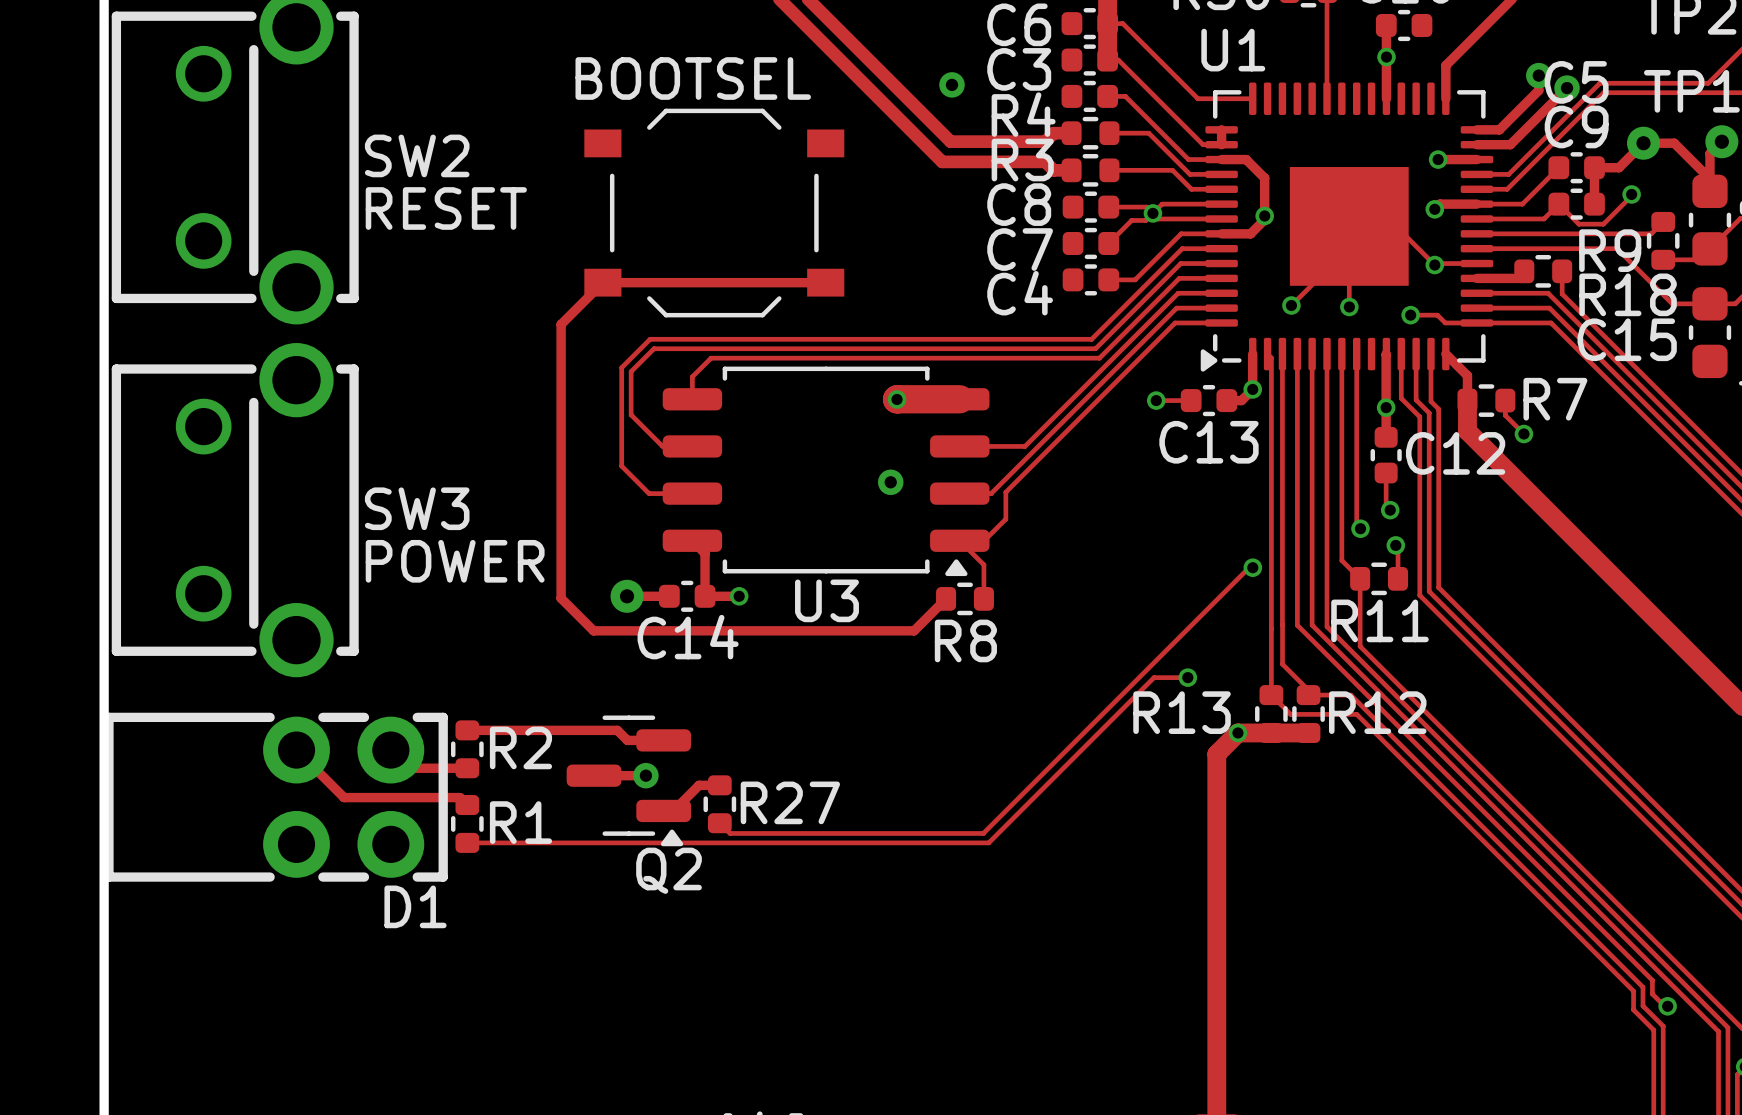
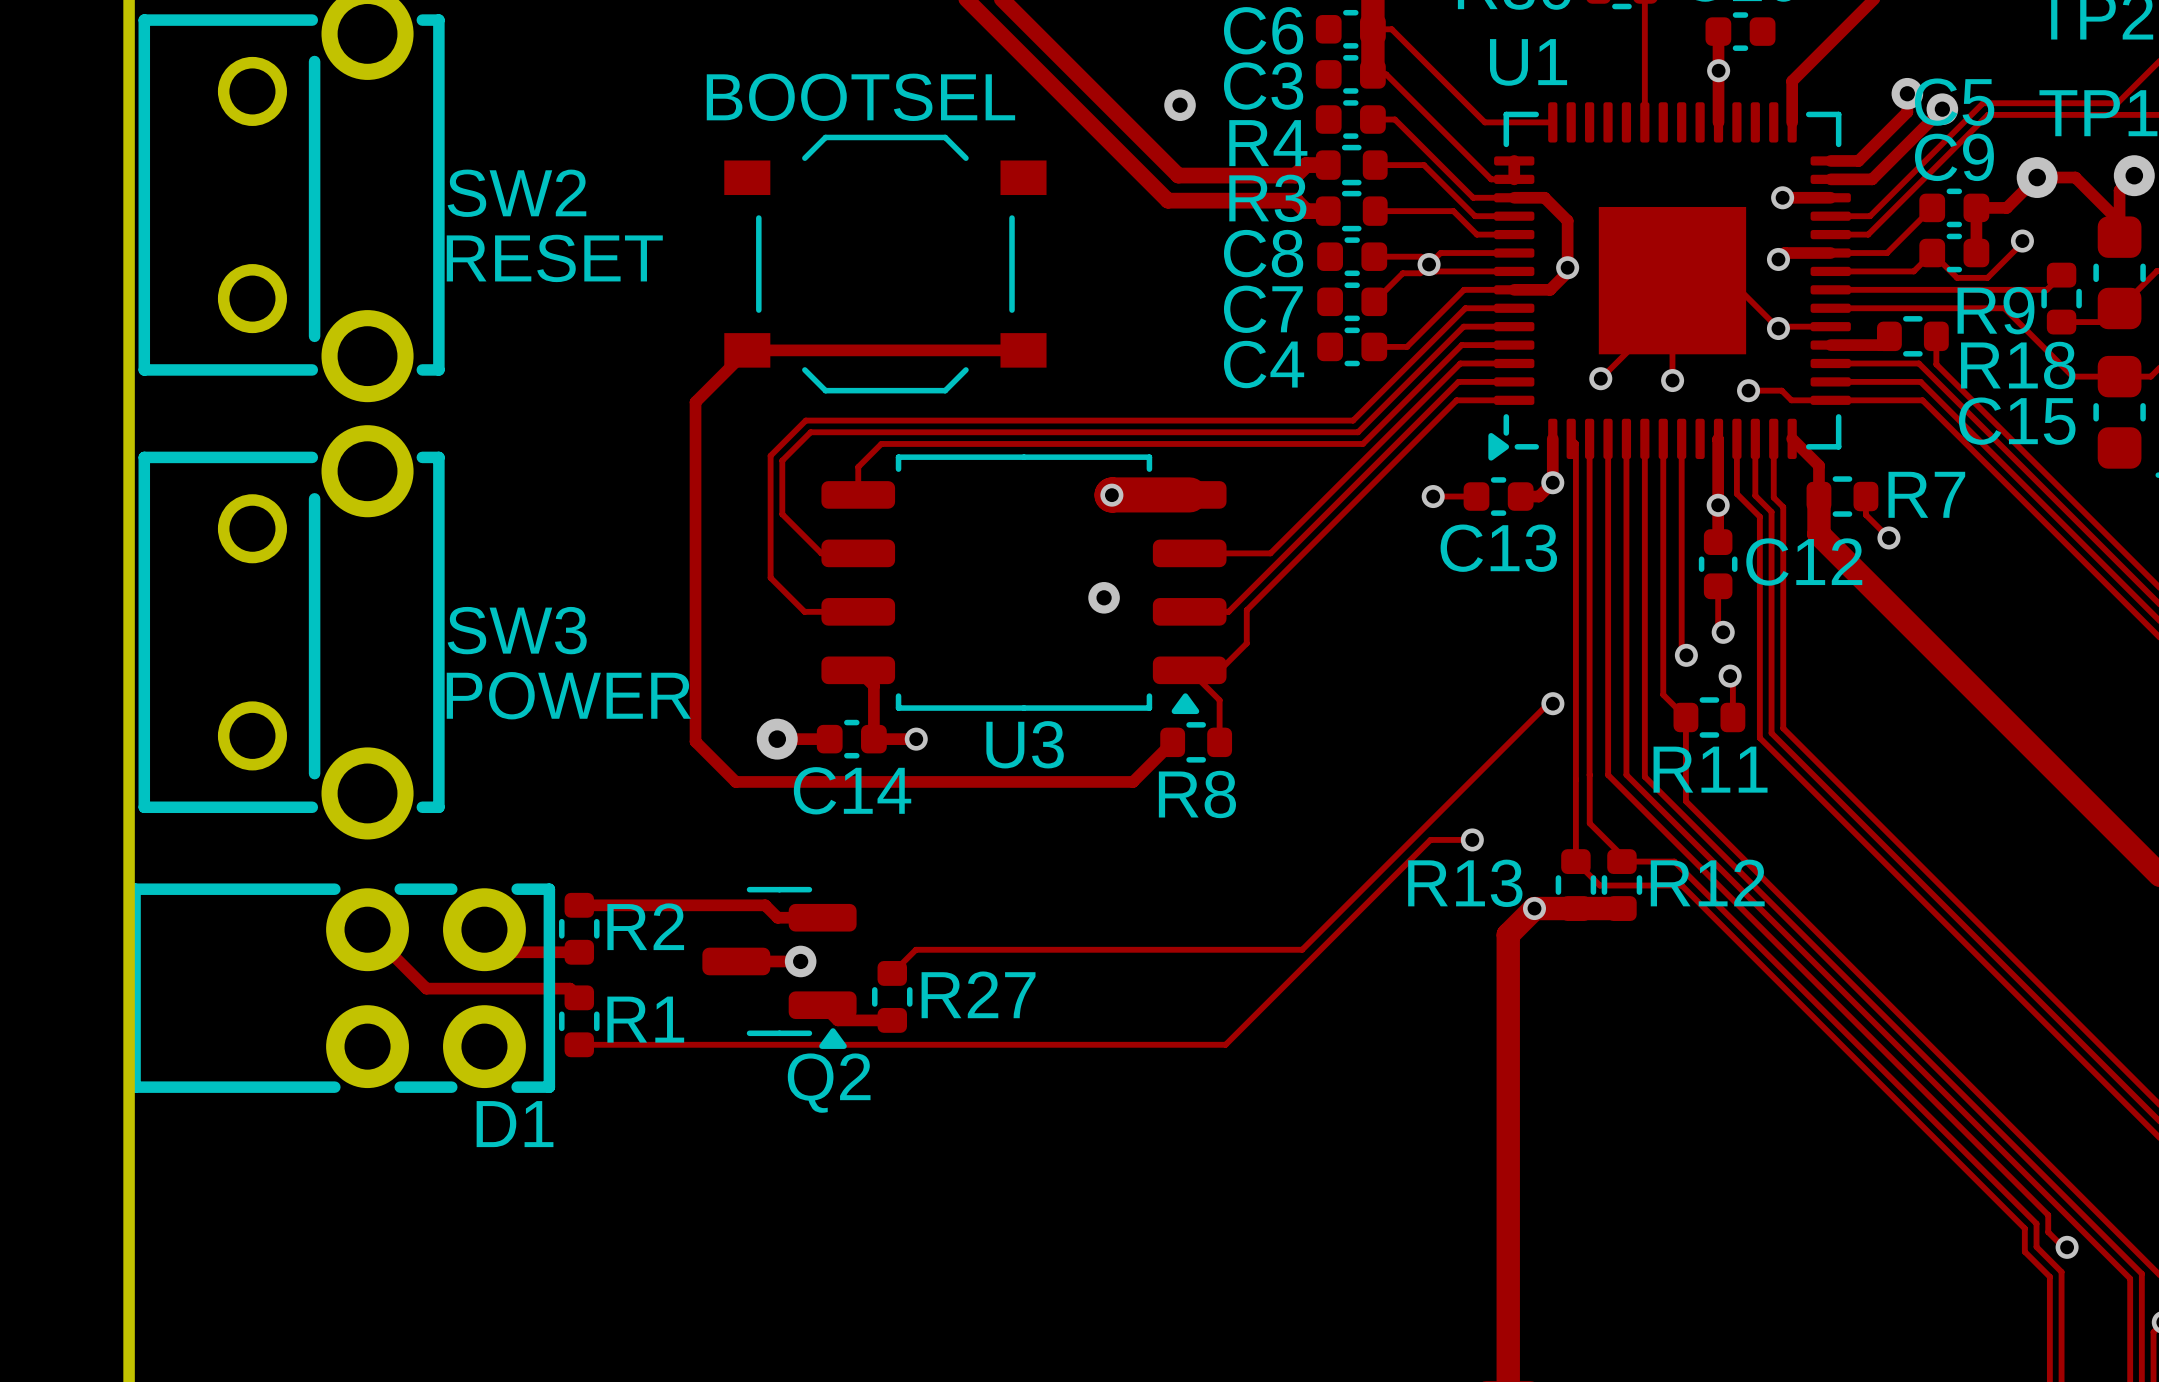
track: (1050, 766) (983, 833) (730, 833) (719, 823) -> (1302, 949) (915, 949) (892, 973)
track: (719, 785) (699, 785) (673, 810) (663, 810) -> (892, 1020) (837, 1020) (822, 1005)

